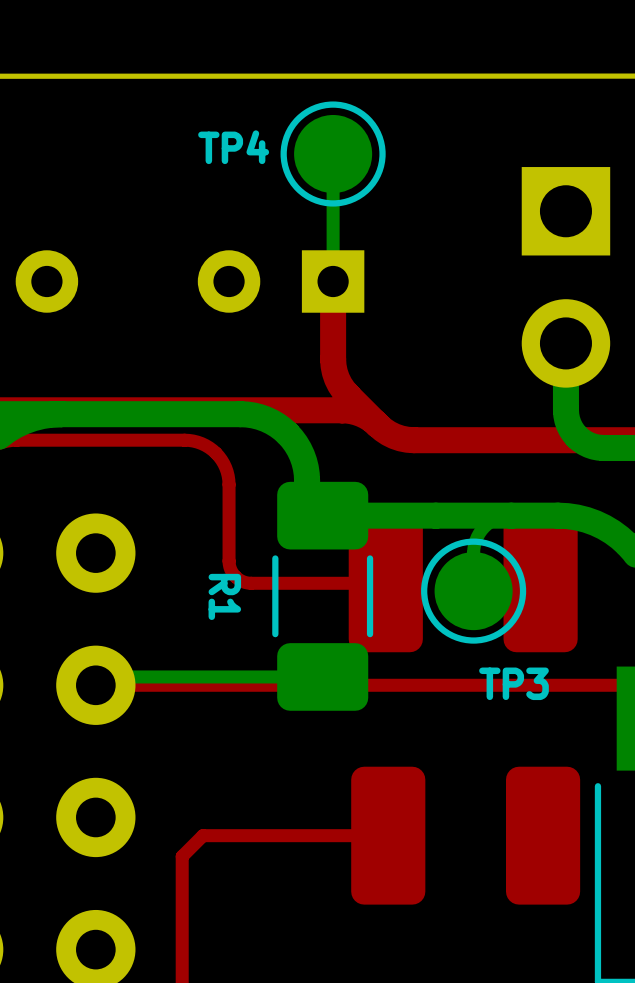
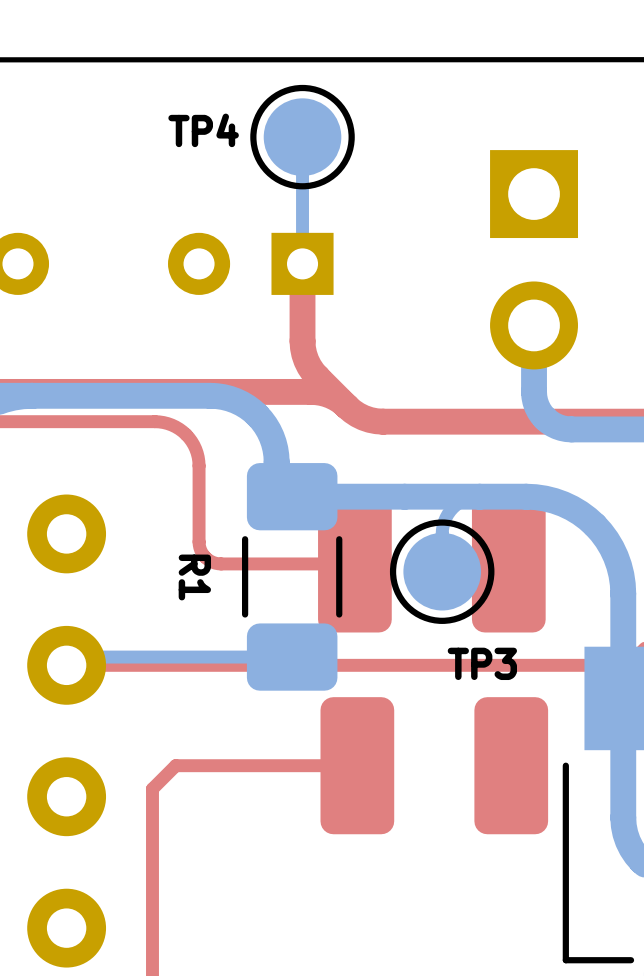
top track: (388, 835) (203, 835) (182, 856) -> (357, 765) (175, 765) (152, 788) (152, 835)
part position: (465, 835) -> (434, 765)

